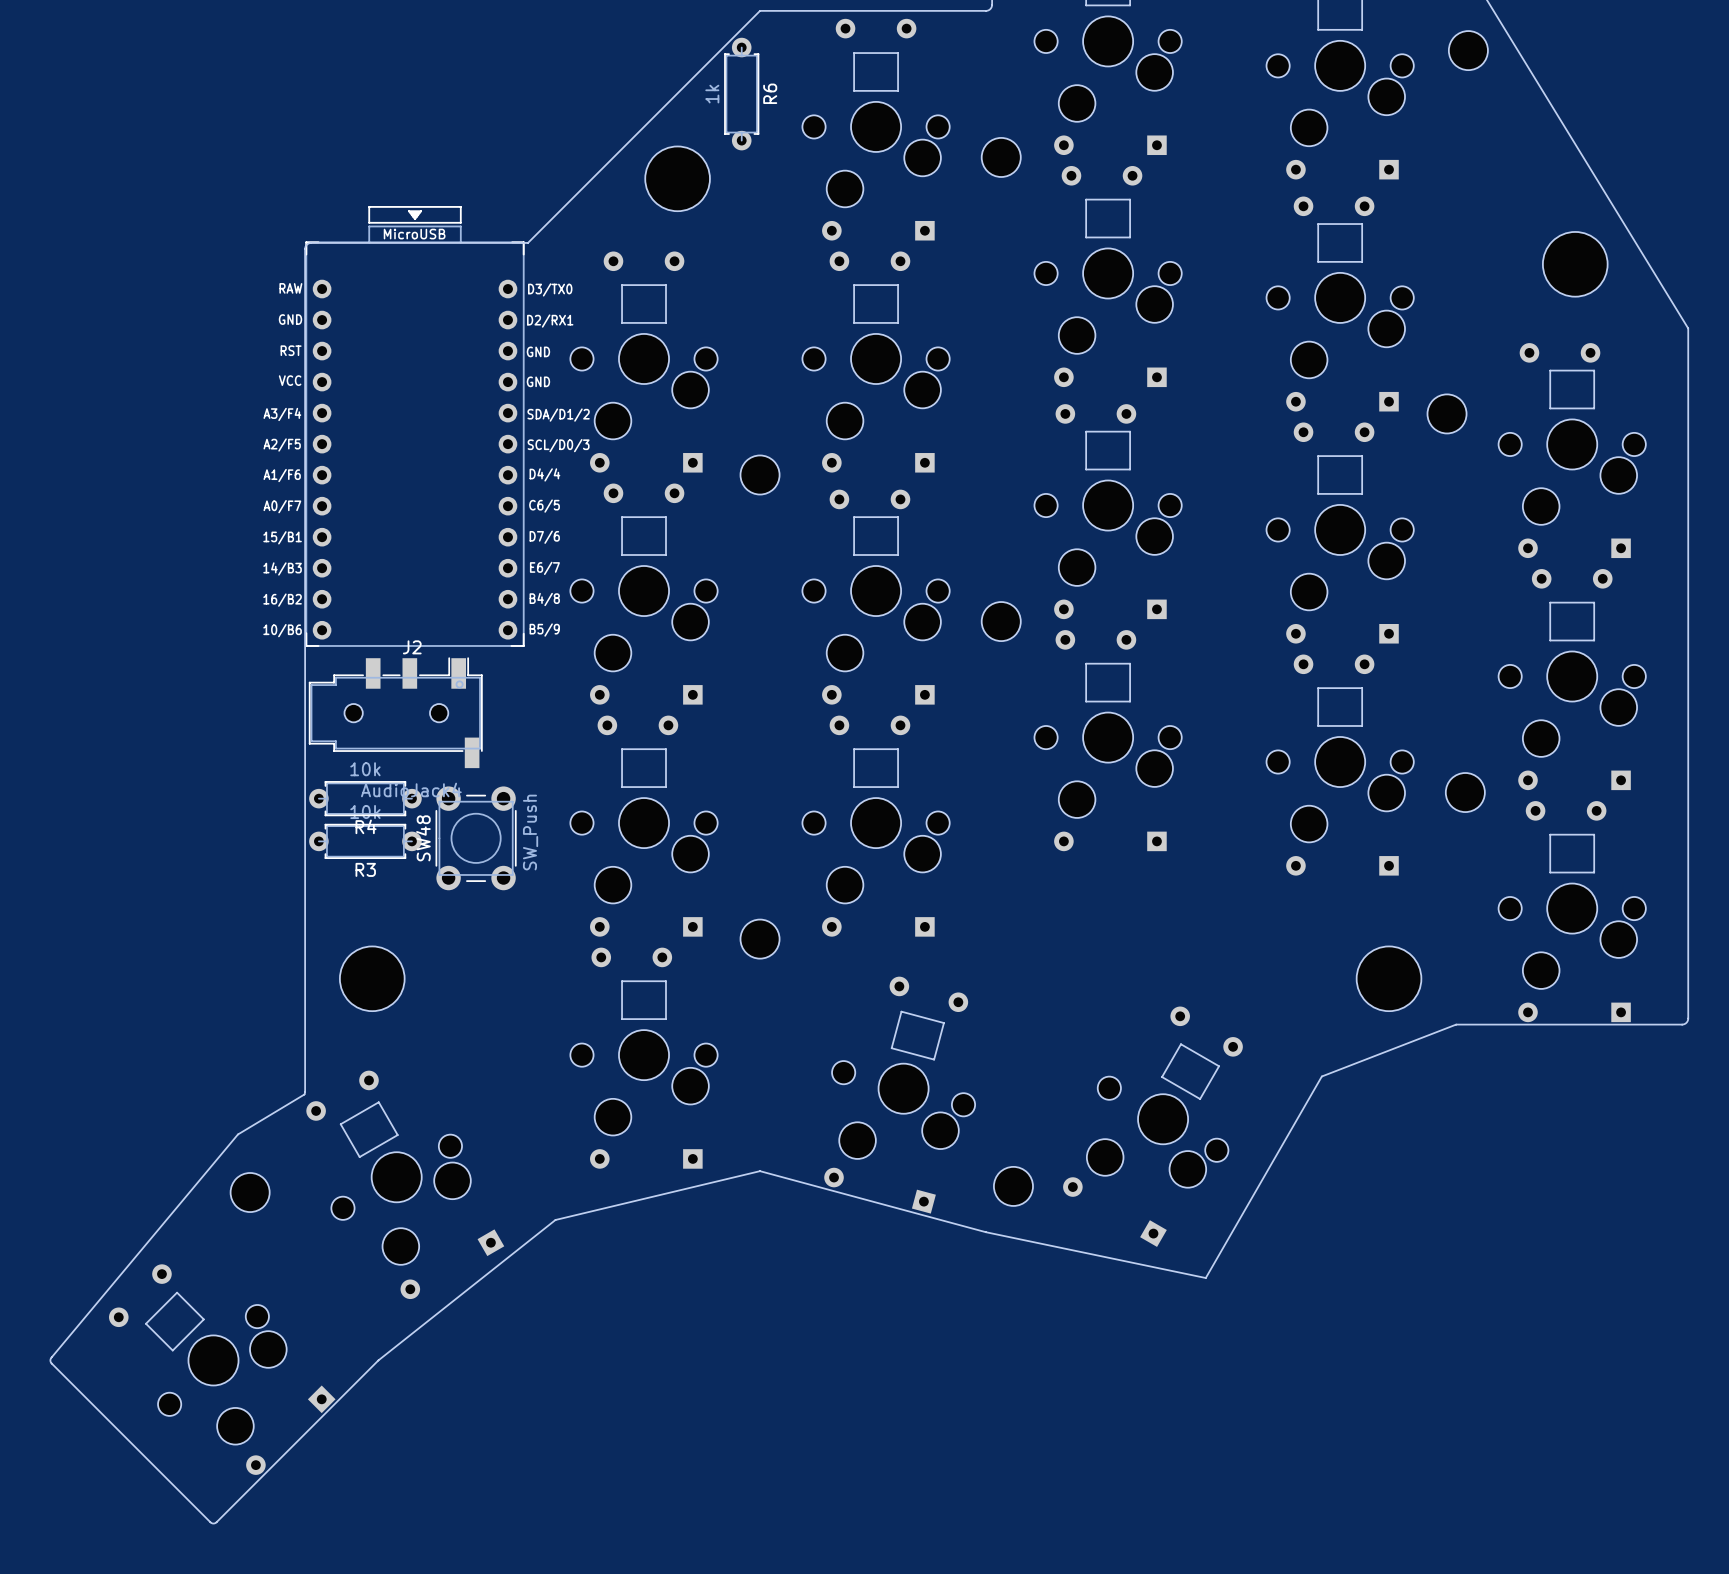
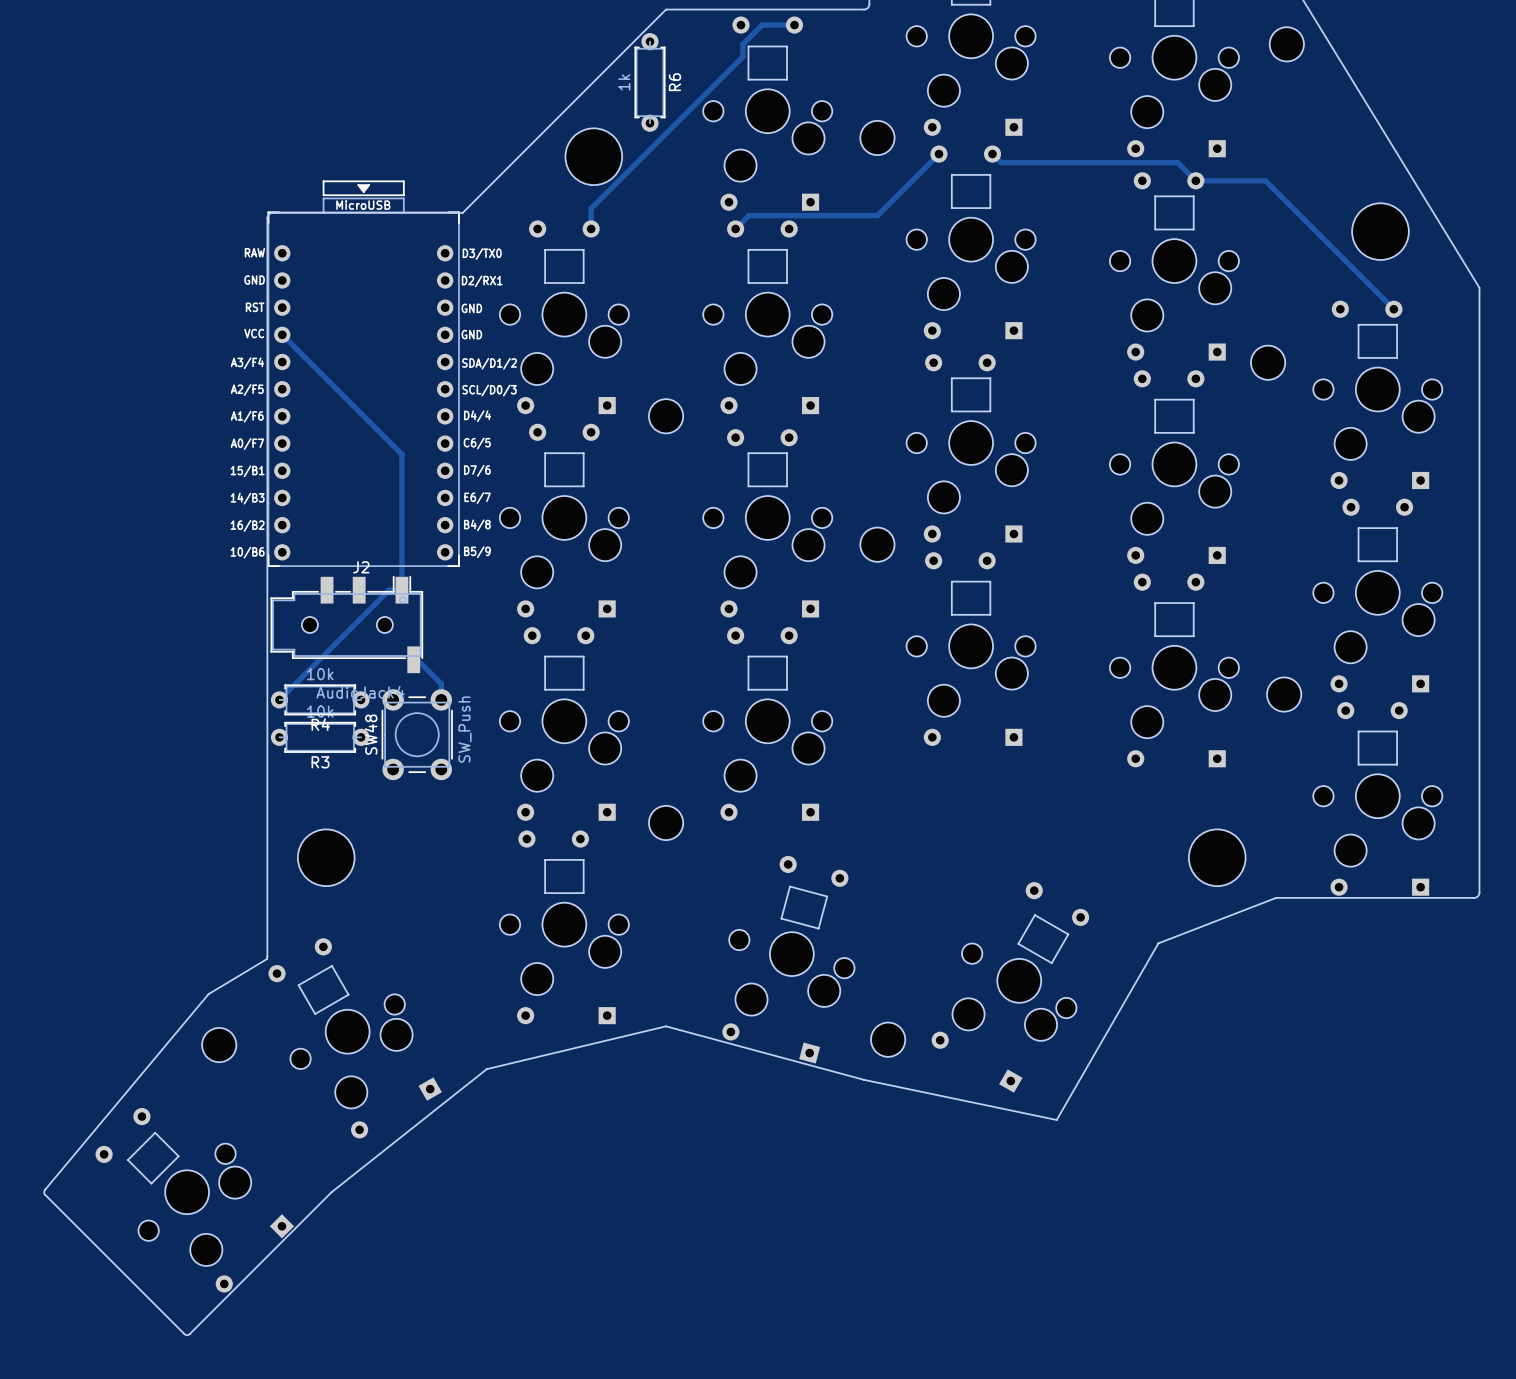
track: none -> (794, 25) (762, 25) (743, 44) (743, 56) (591, 208) (591, 228)
track: none -> (938, 154) (877, 215) (749, 215) (735, 228)
track: none -> (992, 154) (1001, 162) (1177, 162) (1195, 180) (1265, 180) (1393, 309)
track: none -> (282, 334) (401, 454) (401, 590) (389, 590) (279, 699)
track: none -> (413, 659) (417, 659) (441, 683) (441, 699)

